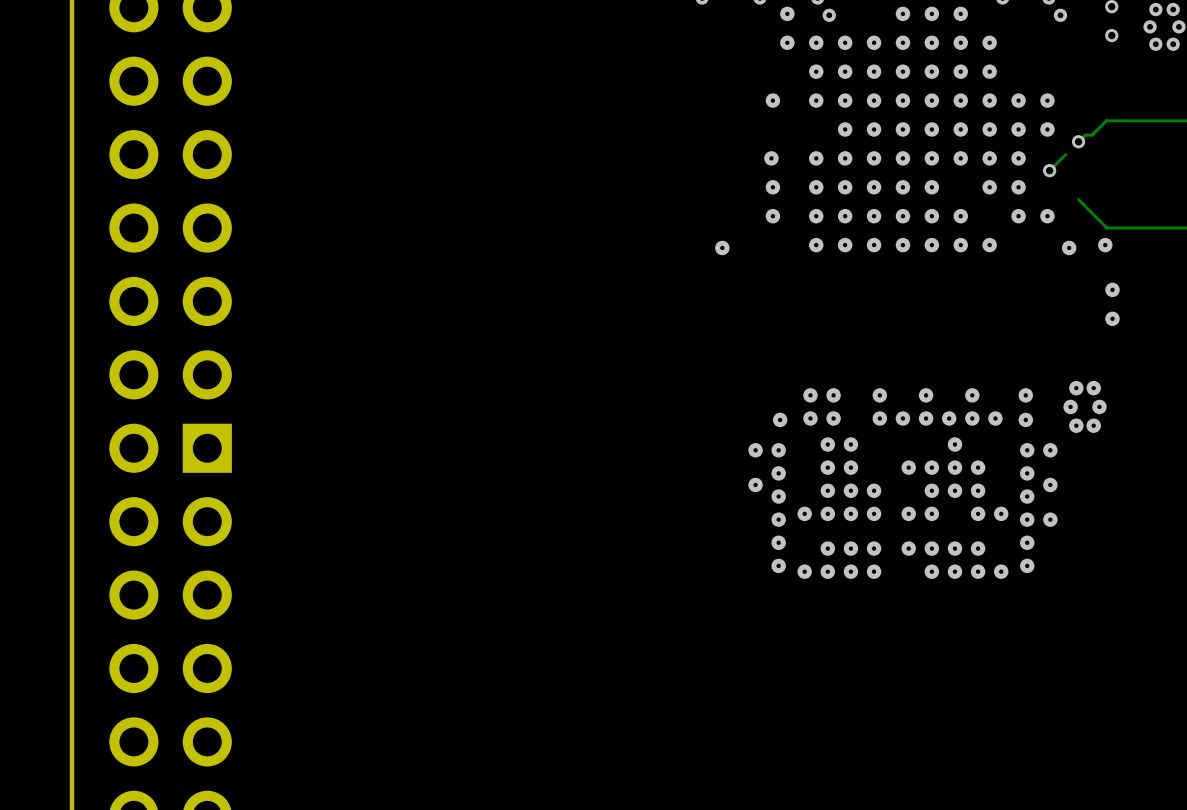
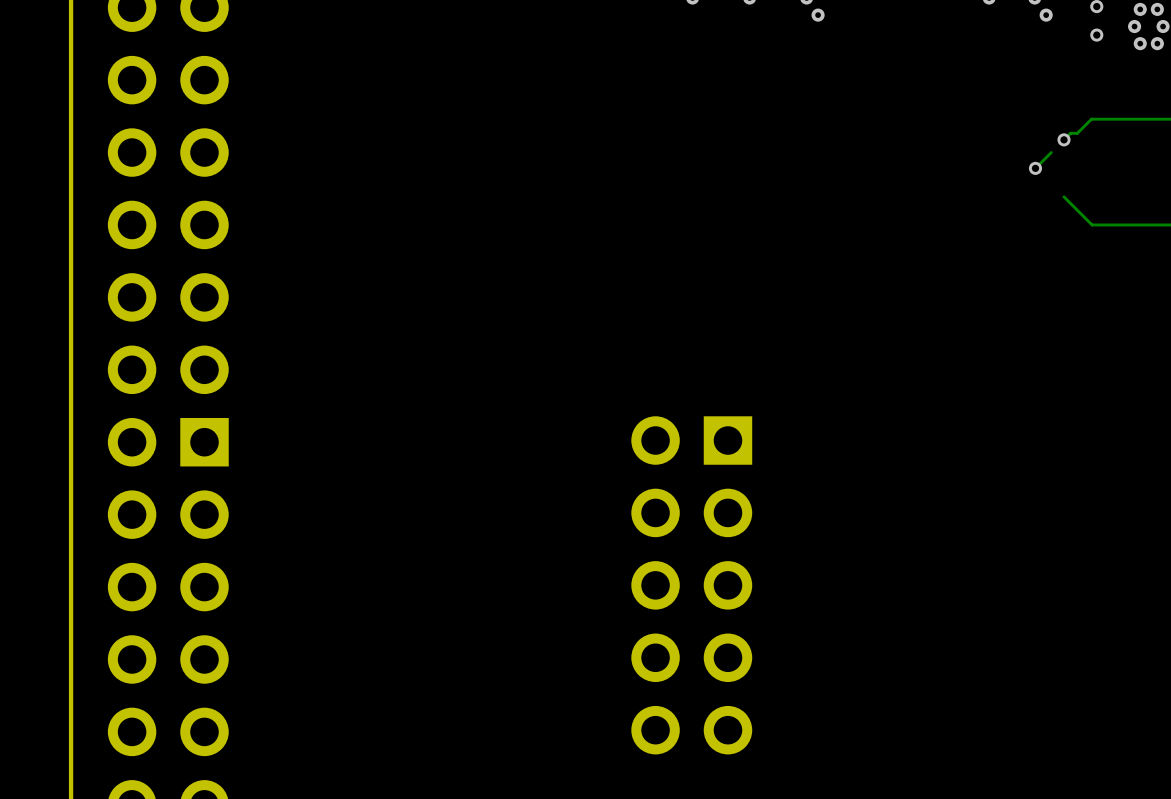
via: (787, 13) -> none
via: (902, 13) -> none
via: (931, 13) -> none
via: (960, 13) -> none
via: (787, 42) -> none
via: (816, 42) -> none
via: (845, 42) -> none
via: (874, 42) -> none
via: (902, 42) -> none
via: (931, 42) -> none
via: (960, 42) -> none
via: (989, 42) -> none
via: (816, 71) -> none
via: (845, 71) -> none
via: (874, 71) -> none
via: (902, 71) -> none
via: (931, 71) -> none
via: (960, 71) -> none
via: (989, 71) -> none
via: (772, 100) -> none
via: (816, 100) -> none
via: (845, 100) -> none
via: (874, 100) -> none
via: (902, 100) -> none
via: (931, 100) -> none
via: (960, 100) -> none
via: (989, 100) -> none
via: (1018, 100) -> none
via: (1047, 100) -> none
via: (845, 129) -> none
via: (874, 129) -> none
via: (902, 129) -> none
via: (931, 129) -> none
via: (960, 129) -> none
via: (989, 129) -> none
via: (1018, 129) -> none
via: (1047, 129) -> none
via: (771, 158) -> none
via: (816, 158) -> none
via: (845, 158) -> none
via: (874, 158) -> none
via: (902, 158) -> none
via: (931, 158) -> none
via: (960, 158) -> none
via: (989, 158) -> none
via: (1018, 158) -> none
via: (772, 187) -> none
via: (816, 187) -> none
via: (845, 187) -> none
via: (874, 187) -> none
via: (902, 187) -> none
via: (931, 187) -> none
via: (989, 187) -> none
via: (1018, 187) -> none
via: (772, 216) -> none
via: (816, 216) -> none
via: (845, 216) -> none
via: (874, 216) -> none
via: (902, 216) -> none
via: (931, 216) -> none
via: (960, 216) -> none
via: (1018, 216) -> none
via: (1047, 216) -> none
via: (816, 245) -> none
via: (845, 245) -> none
via: (874, 245) -> none
via: (902, 245) -> none
via: (931, 245) -> none
via: (960, 245) -> none
via: (989, 245) -> none
via: (1105, 245) -> none
via: (722, 247) -> none
via: (1069, 247) -> none
via: (1112, 289) -> none
via: (1112, 318) -> none
via: (1076, 388) -> none
via: (1093, 388) -> none
via: (810, 395) -> none
via: (833, 395) -> none
via: (879, 395) -> none
via: (926, 395) -> none
via: (972, 395) -> none
via: (1025, 395) -> none
via: (1070, 406) -> none
via: (1099, 406) -> none
via: (810, 418) -> none
via: (833, 418) -> none
via: (879, 418) -> none
via: (902, 418) -> none
via: (926, 418) -> none
via: (949, 418) -> none
via: (972, 418) -> none
via: (995, 418) -> none
via: (780, 419) -> none
via: (1025, 419) -> none
via: (1076, 425) -> none
via: (1093, 425) -> none
via: (827, 444) -> none
via: (850, 444) -> none
via: (954, 444) -> none
via: (755, 450) -> none
via: (778, 450) -> none
via: (1027, 450) -> none
via: (1050, 450) -> none
via: (827, 467) -> none
via: (850, 467) -> none
via: (908, 467) -> none
via: (931, 467) -> none
via: (954, 467) -> none
via: (978, 467) -> none
via: (778, 473) -> none
via: (1027, 473) -> none
via: (755, 484) -> none
via: (1050, 484) -> none
via: (827, 490) -> none
via: (850, 490) -> none
via: (874, 490) -> none
via: (931, 490) -> none
via: (954, 490) -> none
via: (978, 490) -> none
via: (778, 496) -> none
via: (1027, 496) -> none
via: (804, 513) -> none
via: (827, 513) -> none
via: (850, 513) -> none
via: (874, 513) -> none
via: (908, 513) -> none
via: (931, 513) -> none
via: (978, 513) -> none
via: (1001, 513) -> none
via: (778, 519) -> none
via: (1027, 519) -> none
via: (1050, 519) -> none
via: (778, 542) -> none
via: (1027, 542) -> none
via: (827, 548) -> none
via: (850, 548) -> none
via: (874, 548) -> none
via: (908, 548) -> none
via: (931, 548) -> none
via: (954, 548) -> none
via: (978, 548) -> none
via: (778, 565) -> none
via: (1027, 565) -> none
via: (804, 571) -> none
via: (827, 571) -> none
via: (850, 571) -> none
via: (874, 571) -> none
via: (931, 571) -> none
via: (954, 571) -> none
via: (978, 571) -> none
via: (1001, 571) -> none
part: none -> (691, 585)

